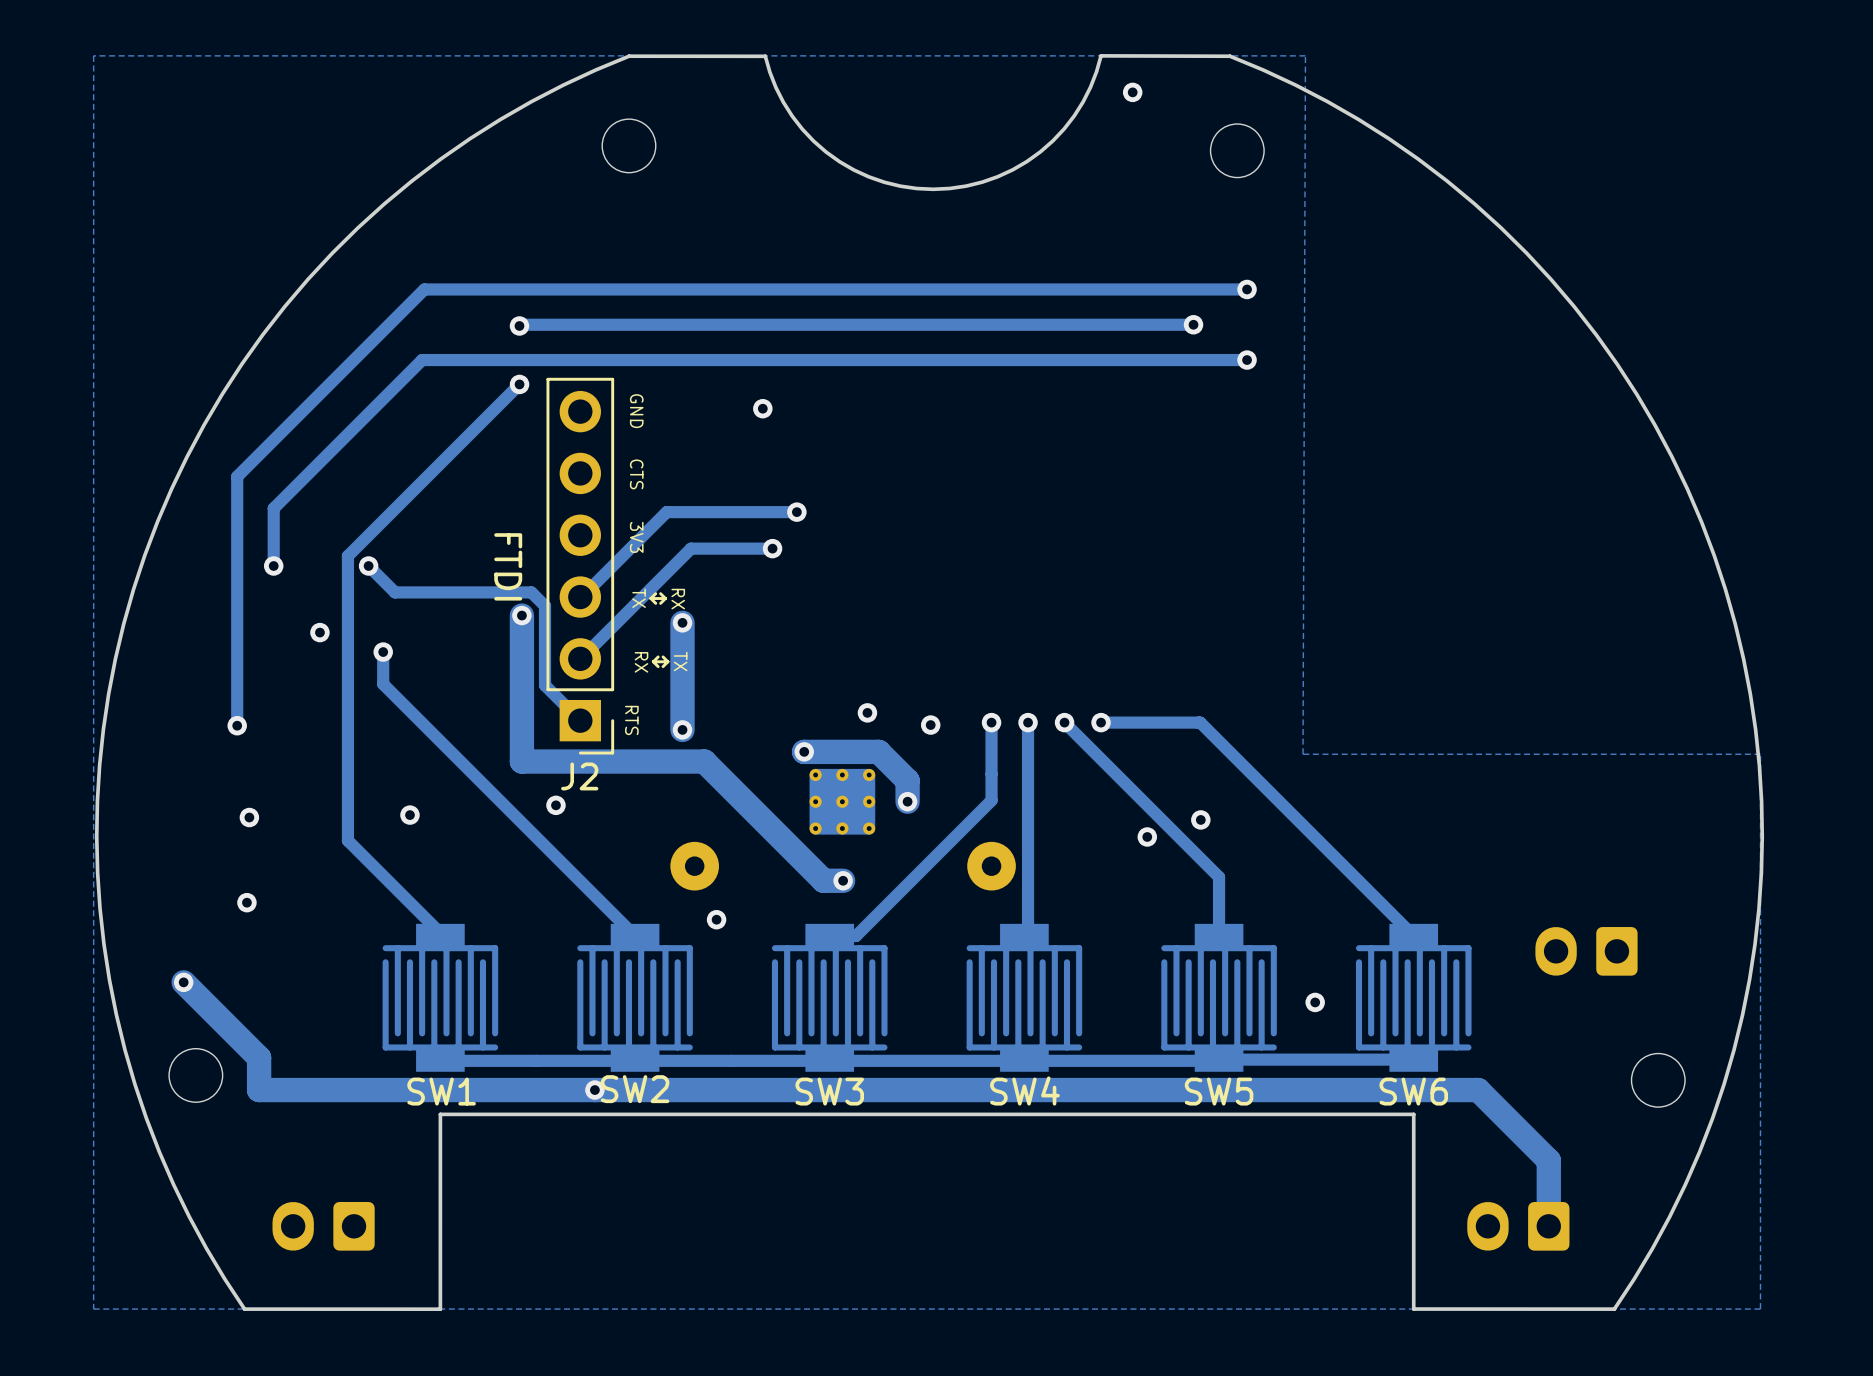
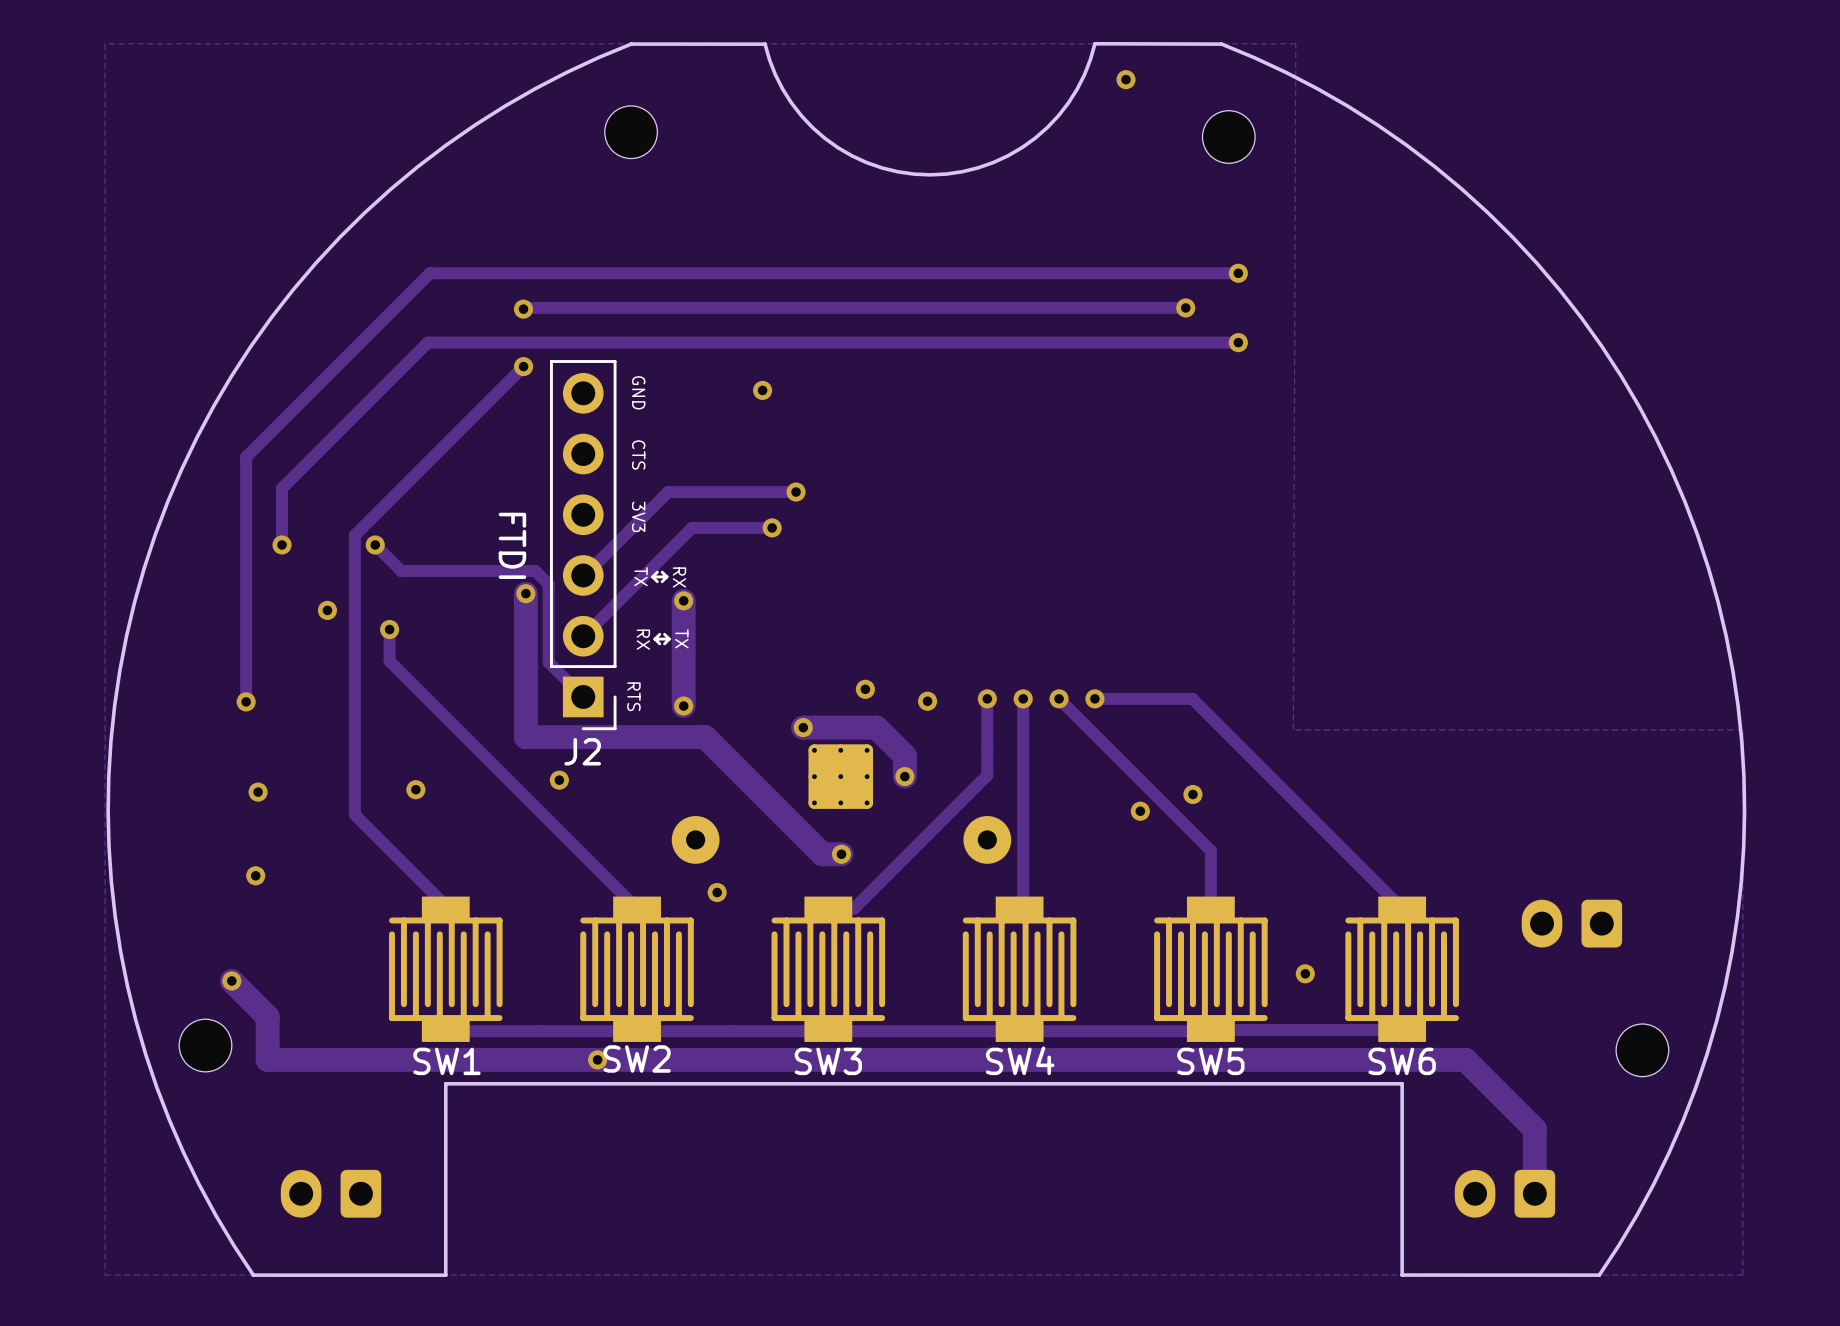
track: (183, 982) (259, 1057) -> (231, 980) (267, 1016) (267, 1028)
via position: (183, 982) -> (231, 980)

